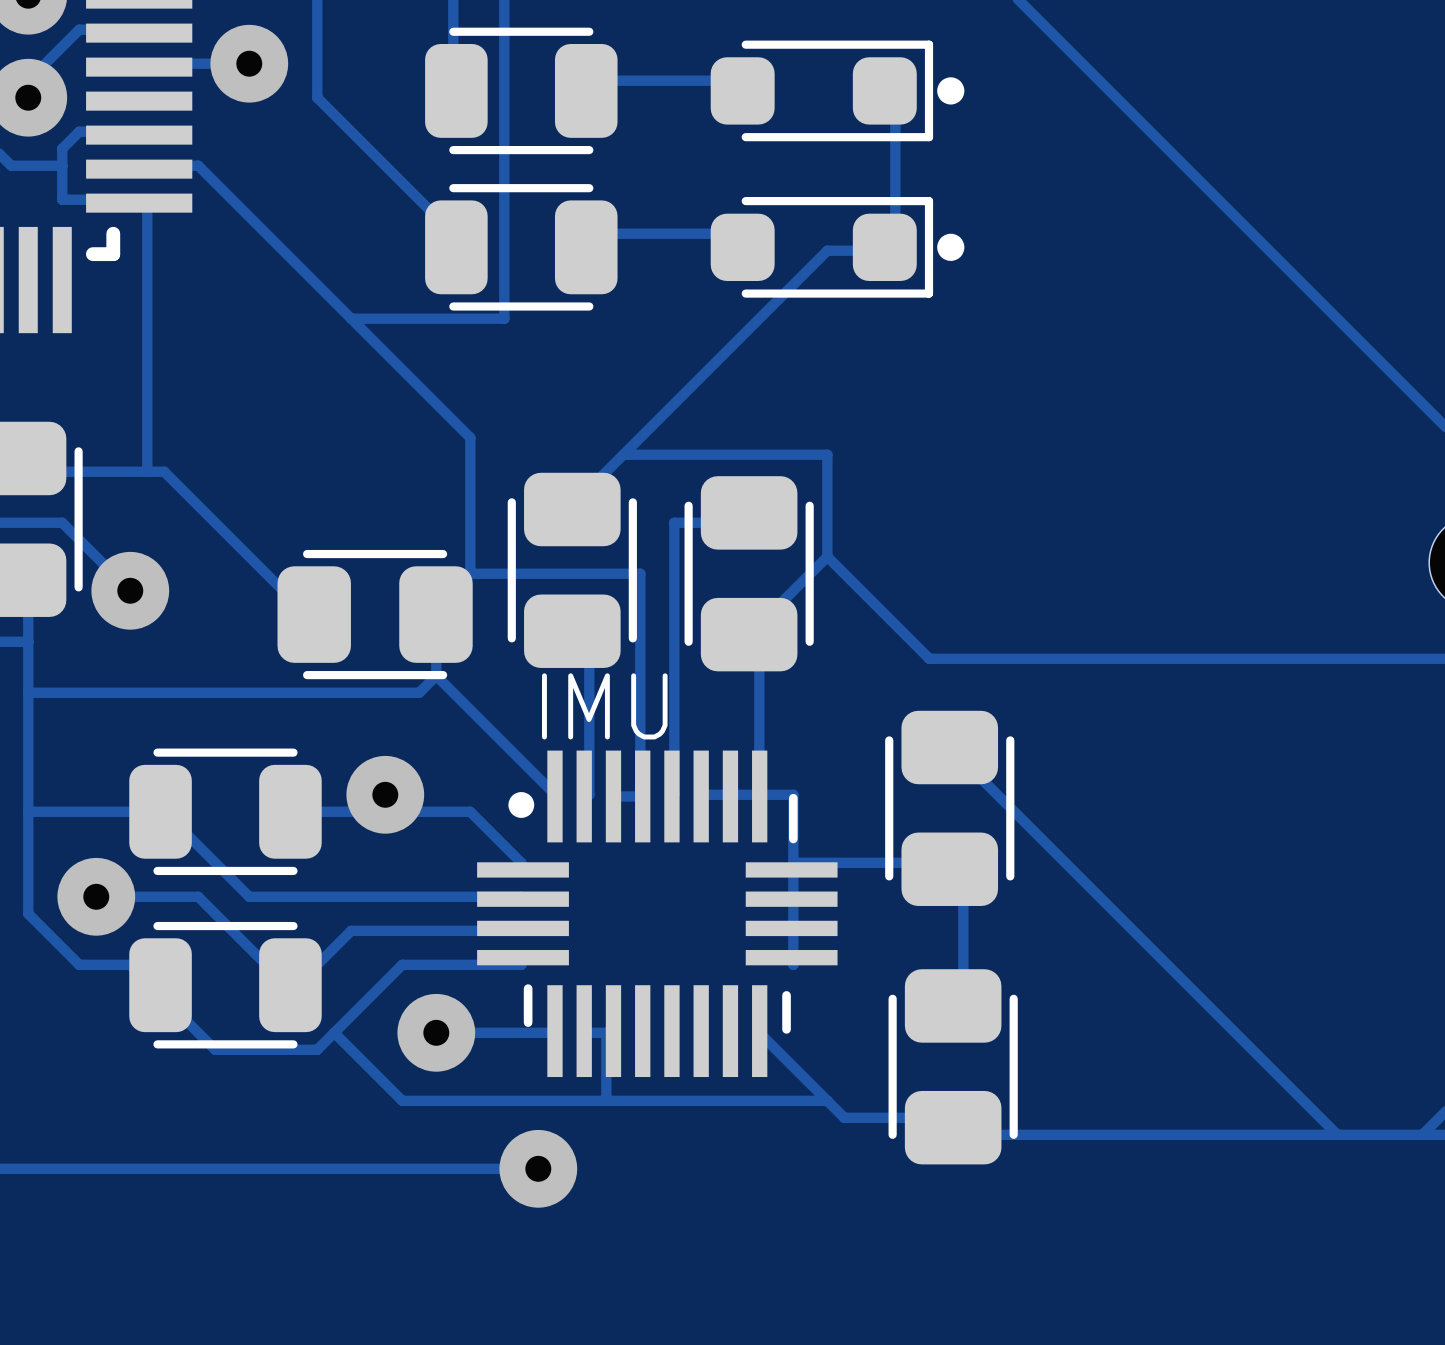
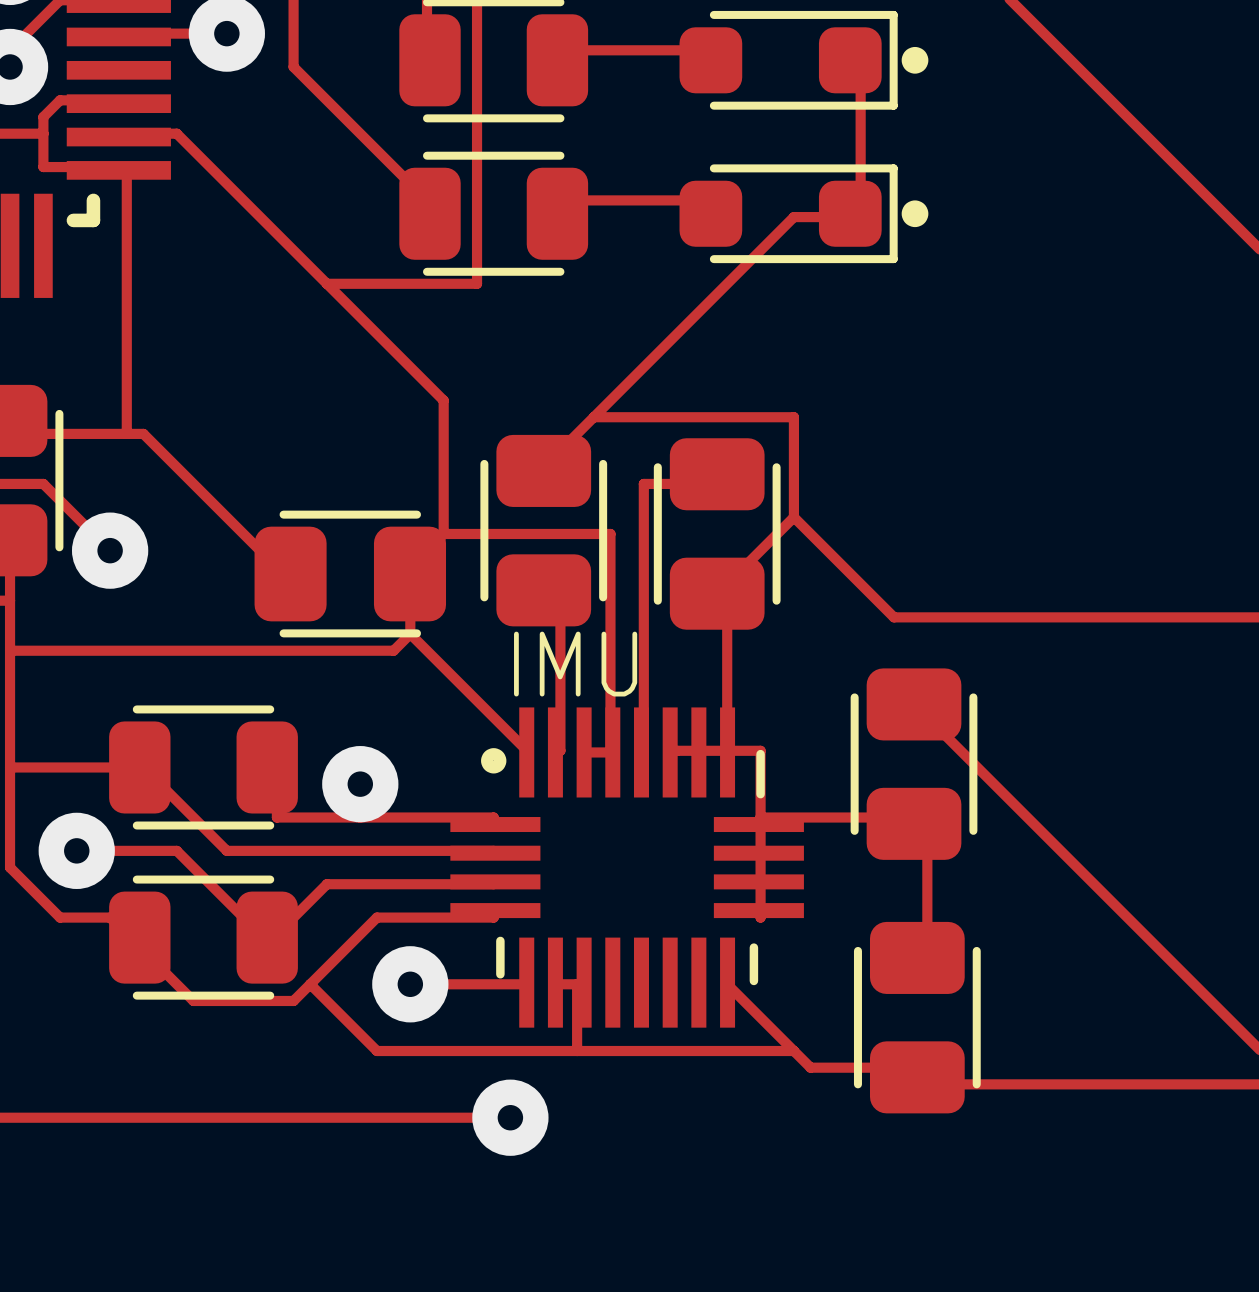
via position: (385, 794) -> (360, 784)
track: (300, 811) (470, 811) (521, 862) -> (276, 767) (276, 817) (493, 817)

